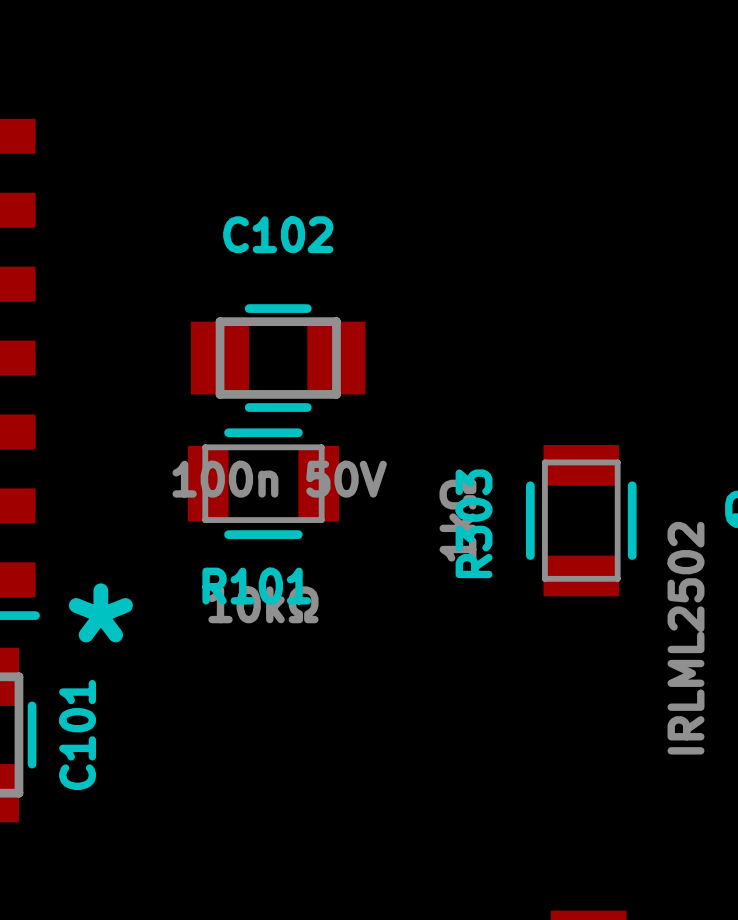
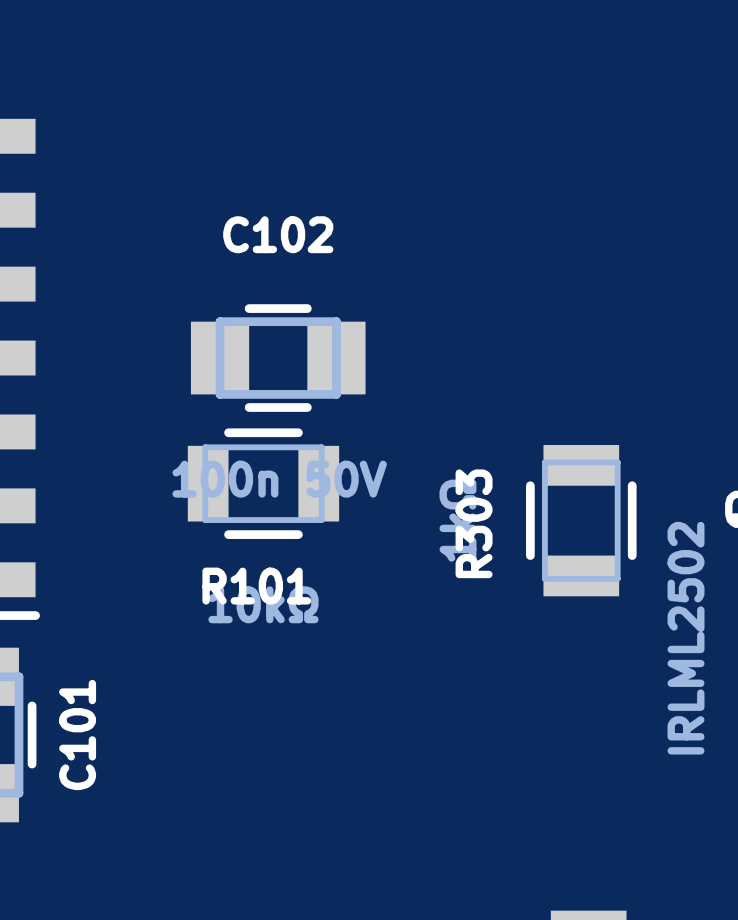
text: * (100, 612) -> none

